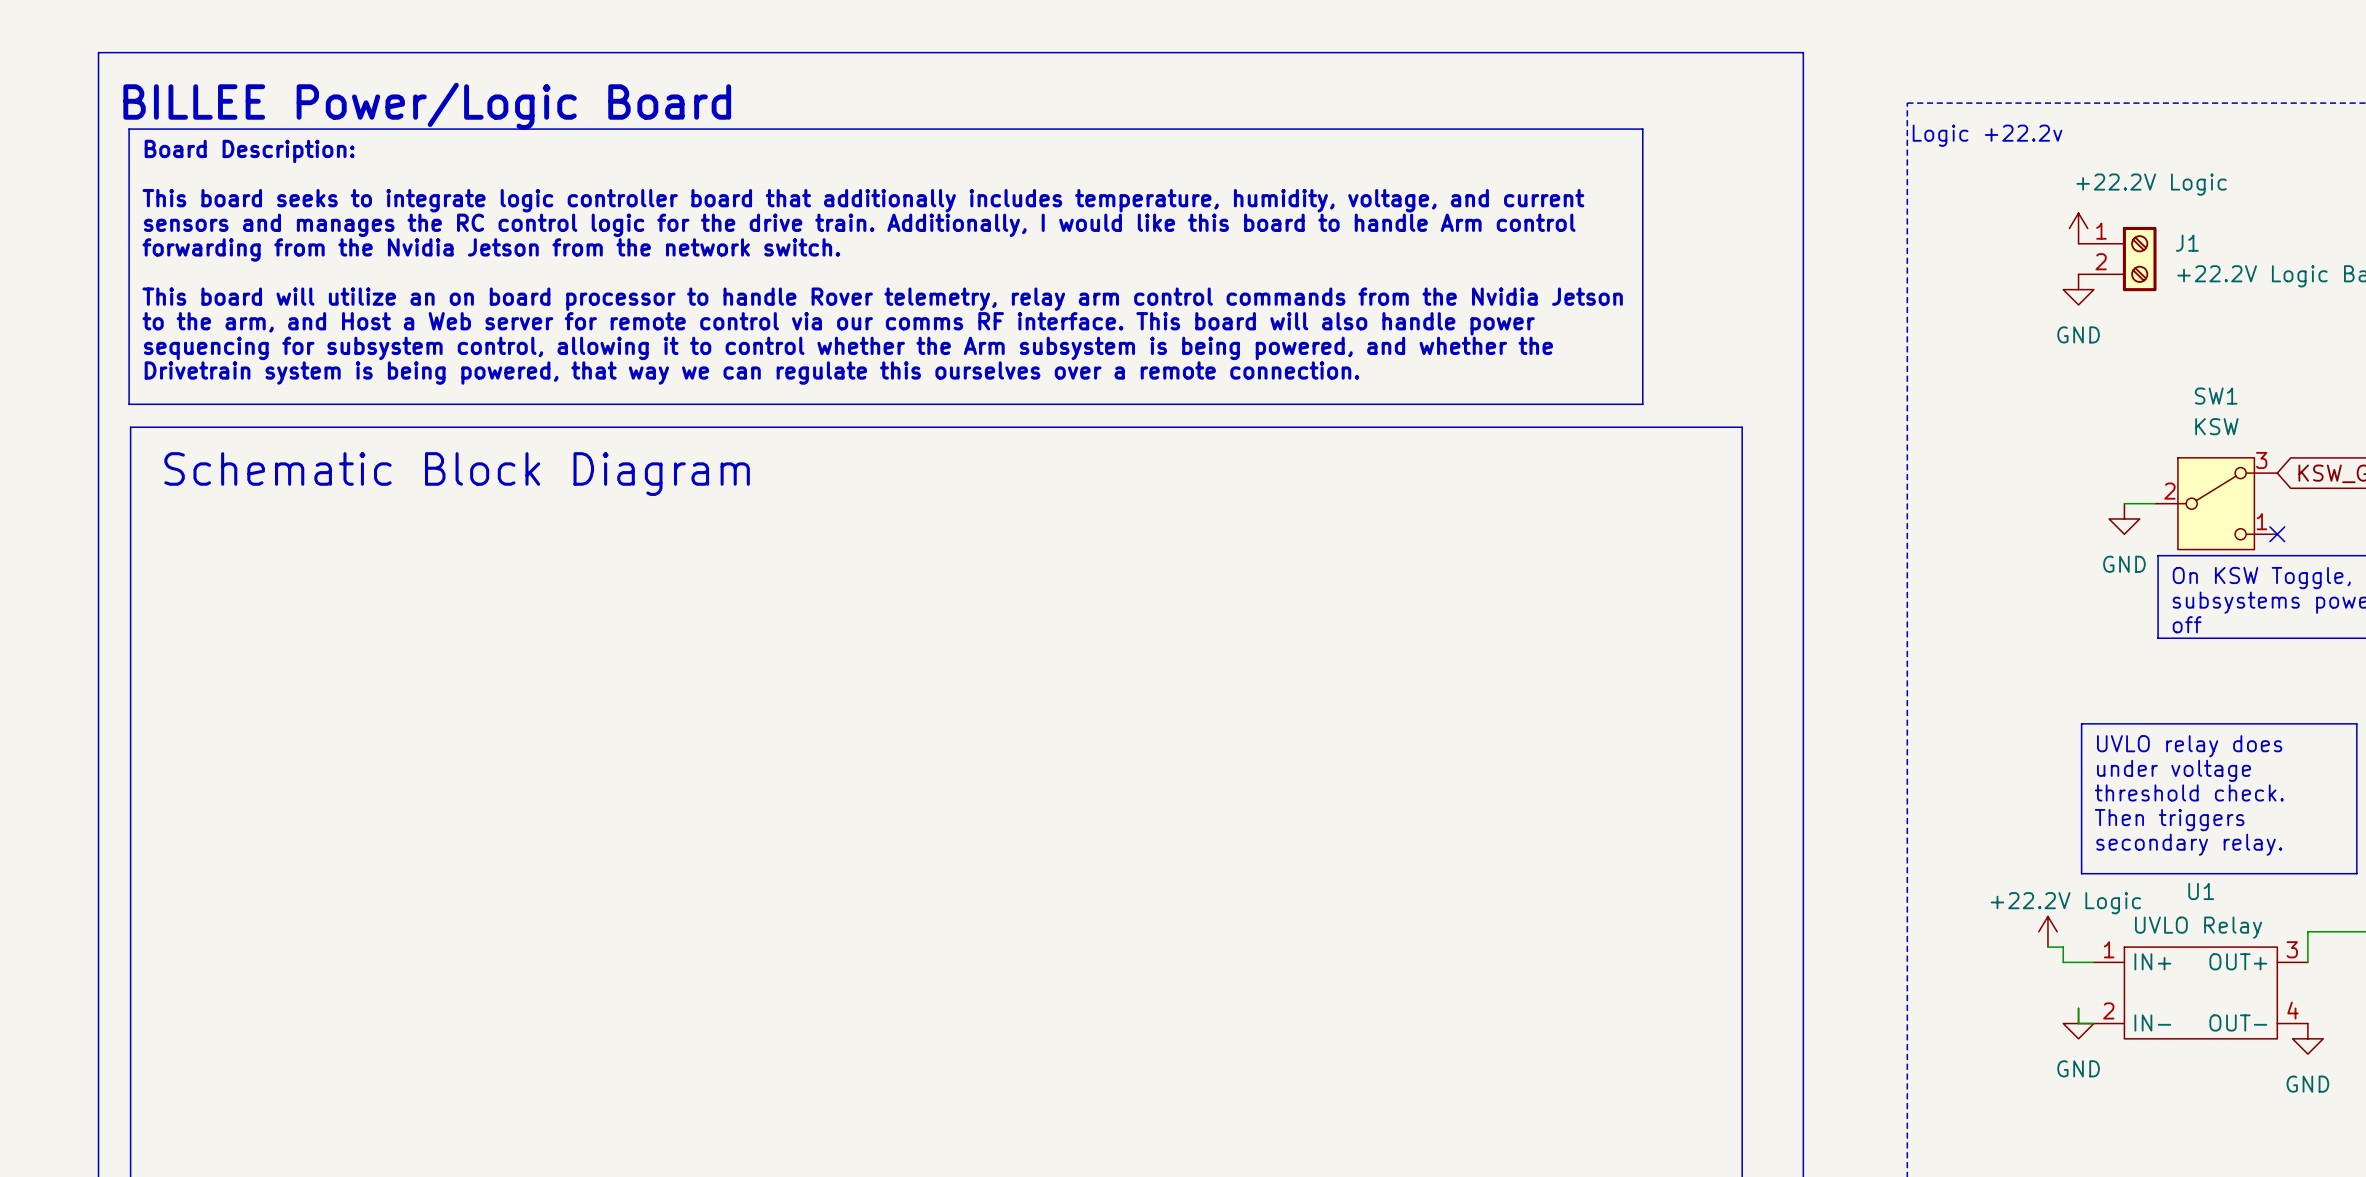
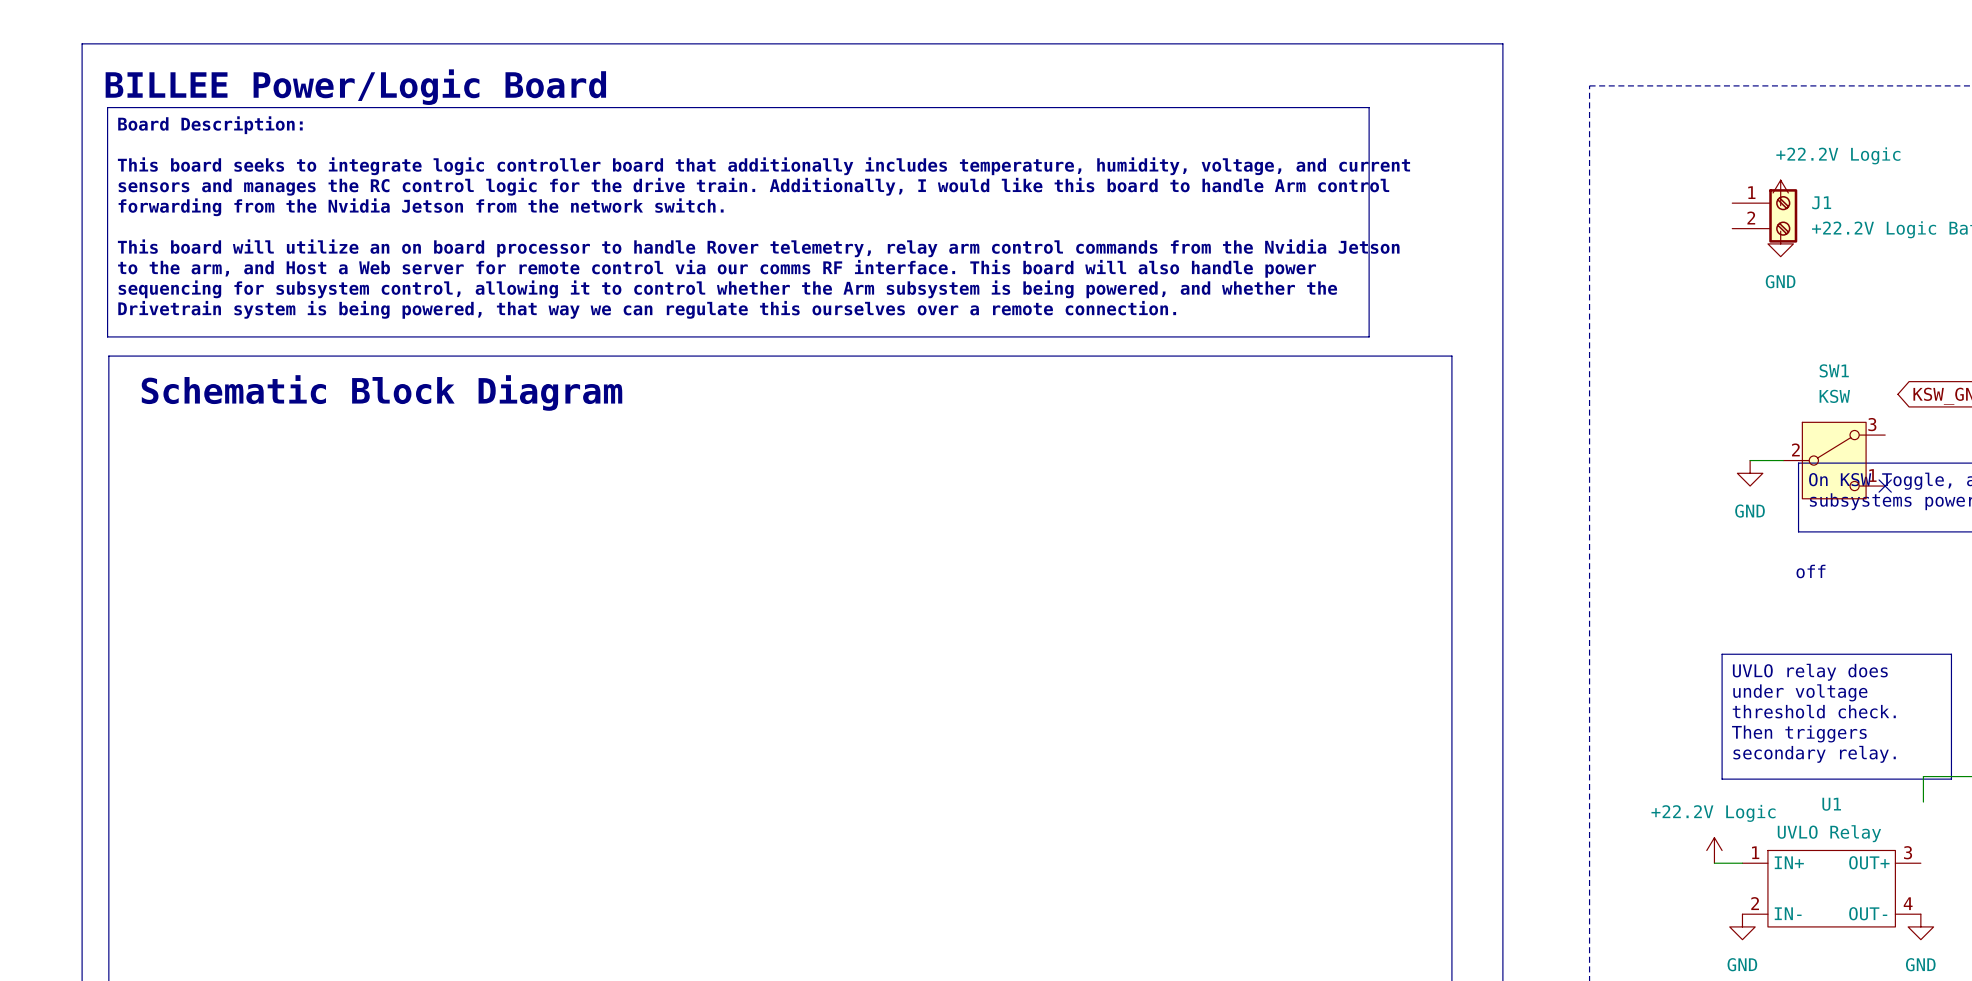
text: Logic +22.2v (1987, 135) -> none
power symbol position: +22.2V Logic (2078, 228) -> +22.2V Logic (1780, 192)
power symbol position: GND (2078, 289) -> GND (1780, 243)
wire: (2124, 503) (2155, 503) -> none
SW1 position: (2216, 503) -> (1834, 460)
power symbol position: GND (2124, 518) -> GND (1750, 473)
no-connect mark position: (2277, 534) -> (1885, 486)
wire: none -> (1750, 460) (1783, 460)
text position: off (2187, 624) -> off (1810, 571)
line: (2081, 723) (2356, 723) (2356, 873) (2081, 873) (2081, 723) -> (1722, 654) (1951, 654) (1951, 779) (1722, 779) (1722, 654)
text position: UVLO relay does (2189, 746) -> UVLO relay does (1810, 672)
text position: under voltage (2174, 770) -> under voltage (1800, 692)
text position: threshold check. (2189, 792) -> threshold check. (1814, 711)
text position: Then triggers (2169, 820) -> Then triggers (1799, 733)
text position: secondary relay. (2189, 844) -> secondary relay. (1814, 754)
power symbol text position: +22.2V Logic (2065, 903) -> +22.2V Logic (1713, 813)
power symbol position: +22.2V Logic (2047, 931) -> +22.2V Logic (1714, 850)
wire: (2047, 947) (2063, 947) (2063, 962) (2093, 962) -> none
U1 position: (2200, 992) -> (1831, 888)
wire: (2078, 1008) (2078, 1023) (2093, 1023) -> none
power symbol position: GND (2078, 1023) -> GND (1742, 926)
wire: none -> (1714, 863) (1742, 863)
power symbol position: GND (2307, 1038) -> GND (1920, 926)

